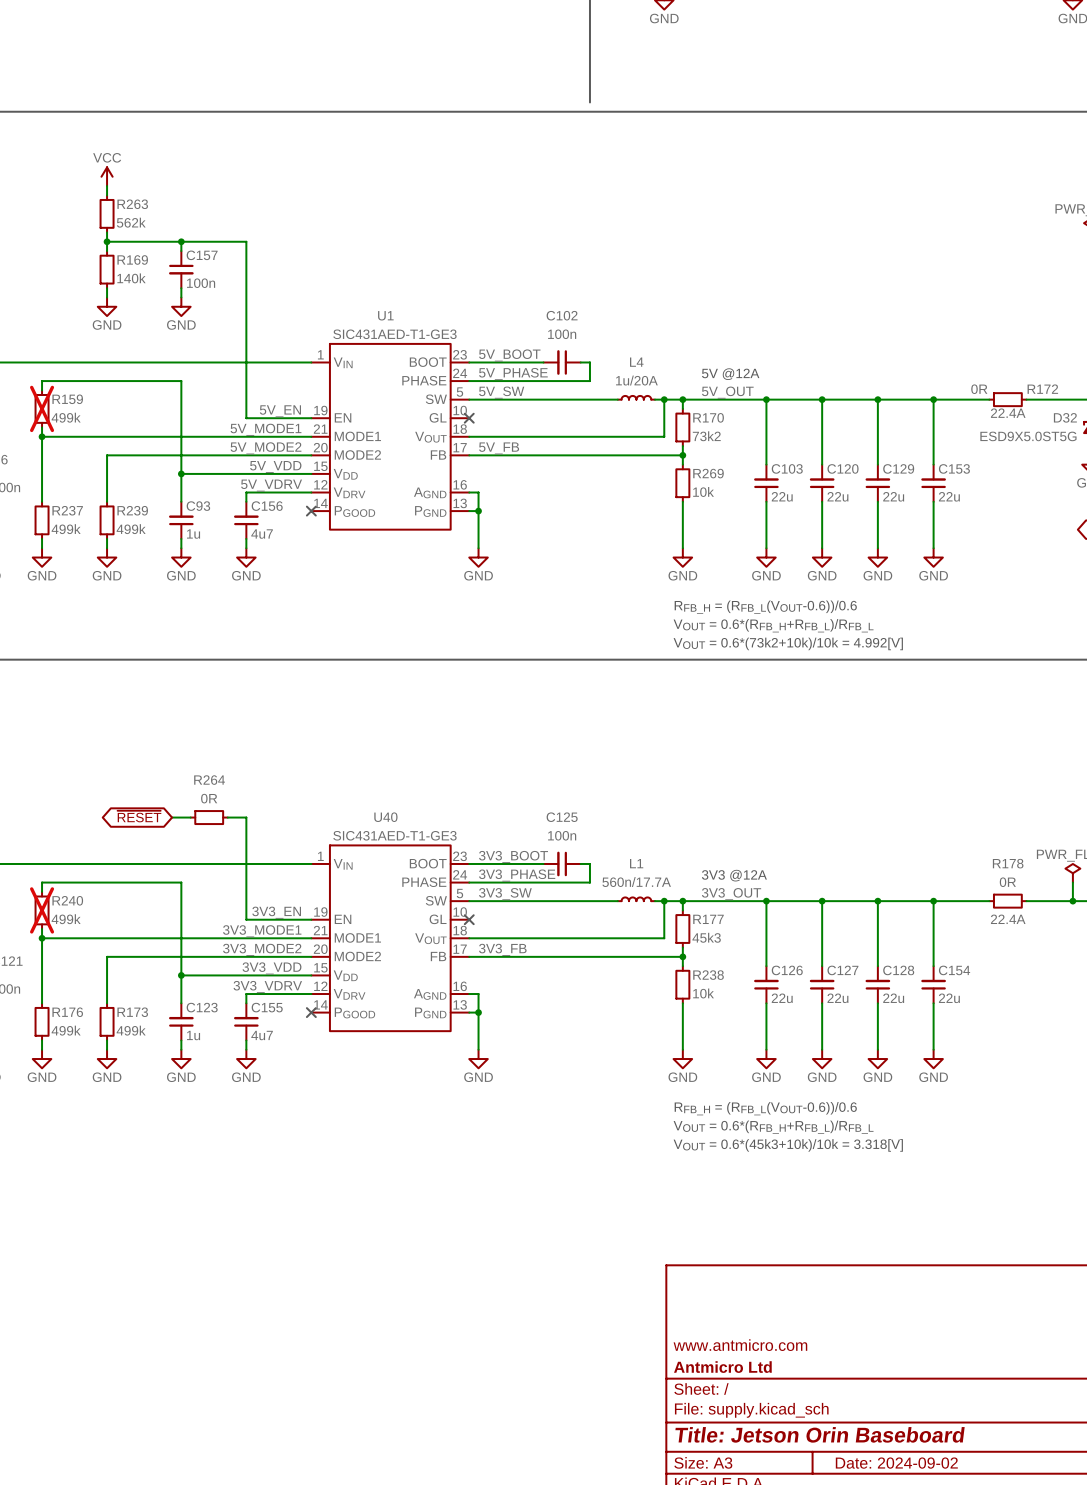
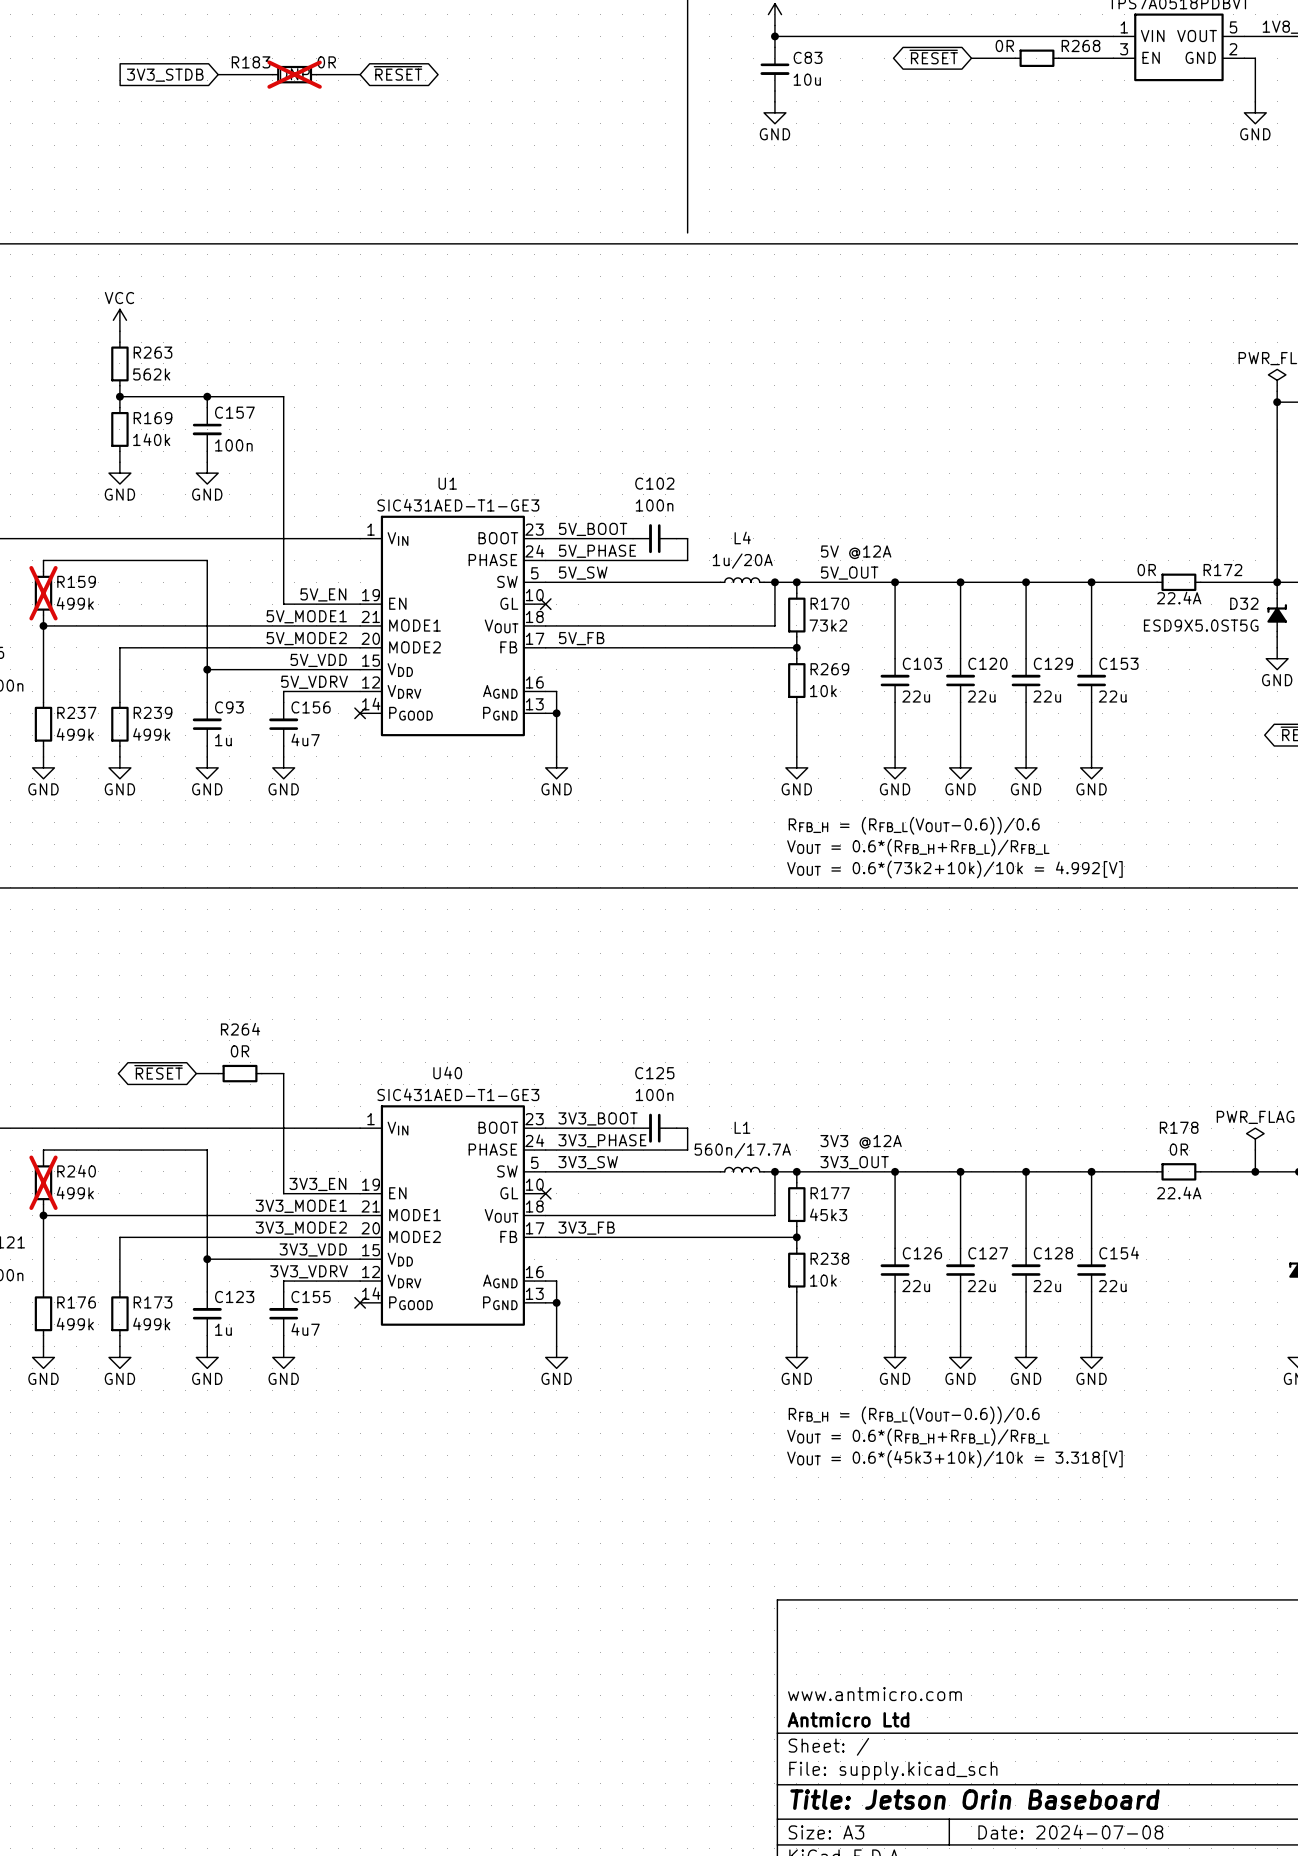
title block: Date: 2024-09-02 (896, 1463) -> Date: 2024-07-08 (1070, 1832)

